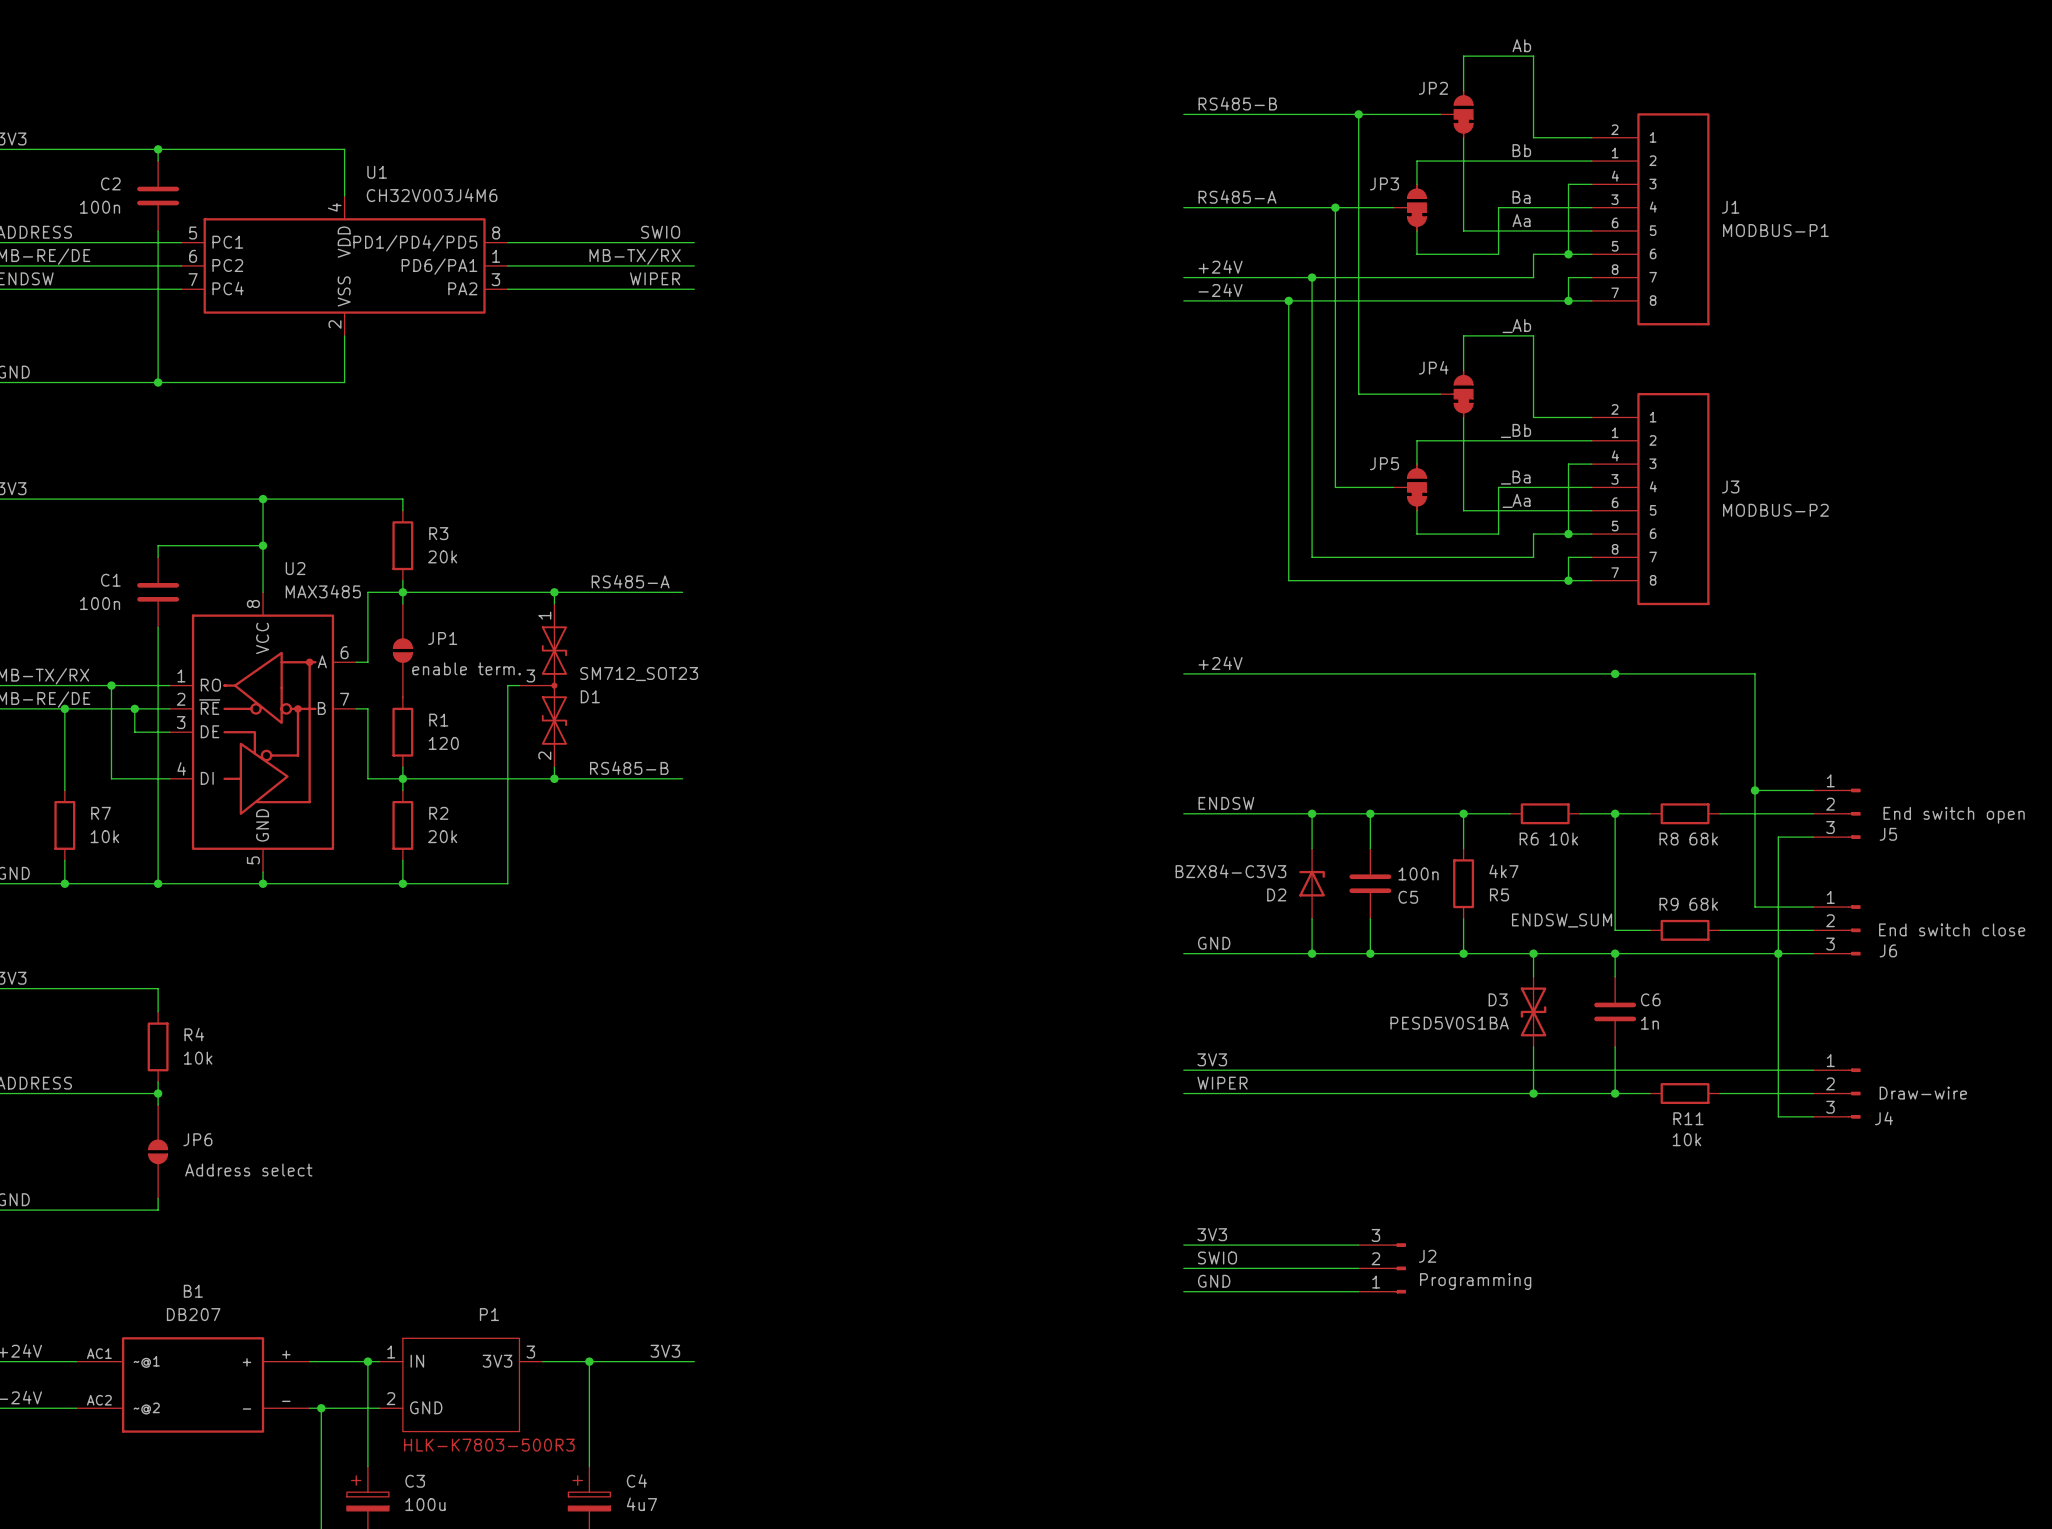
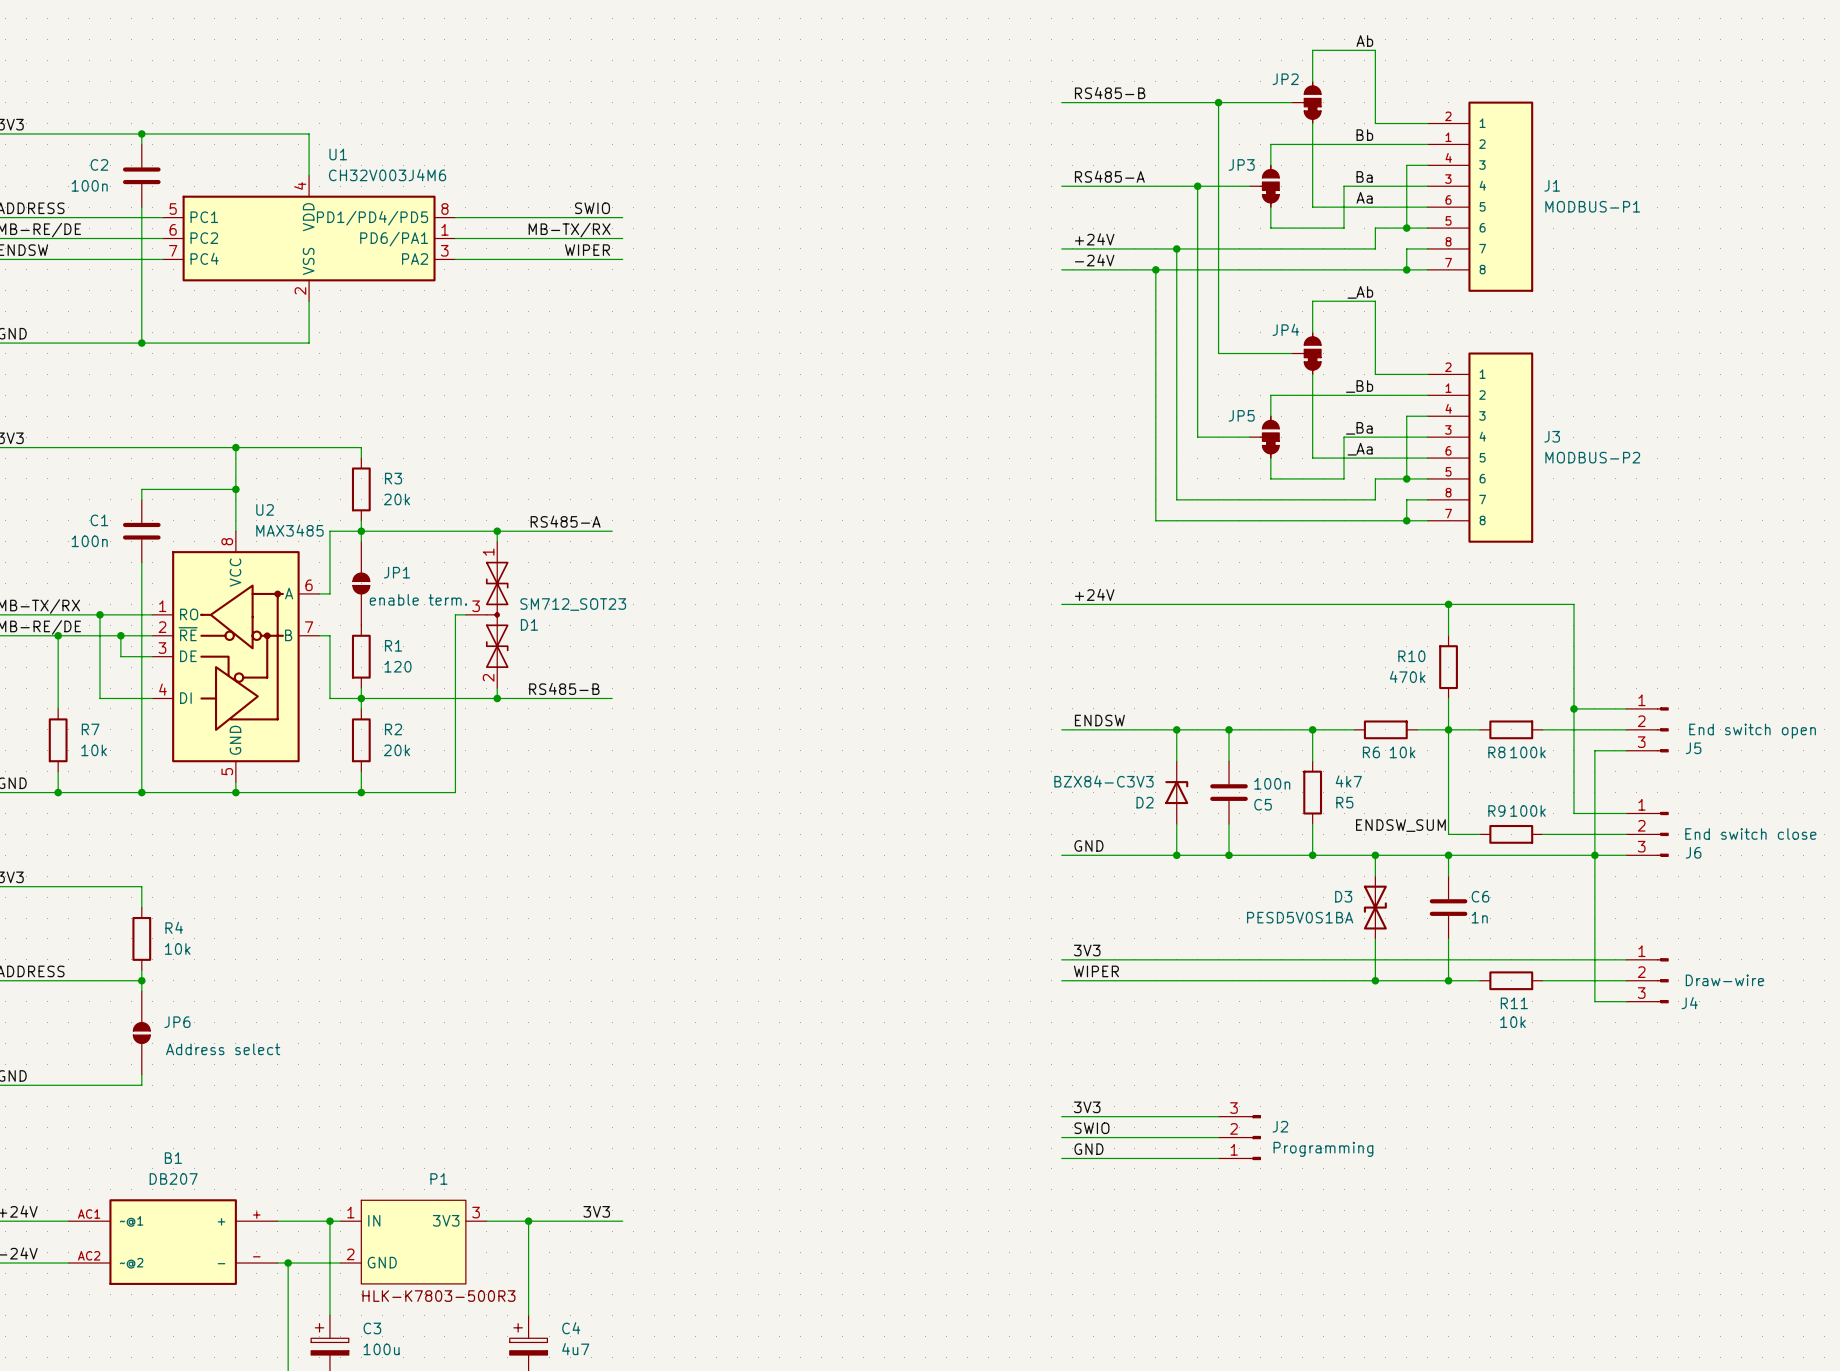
wire: none -> (1448, 604) (1448, 635)
R10: none -> 470k (1448, 667)
wire: none -> (1448, 698) (1448, 729)
R8 value: 68k (1703, 839) -> 100k (1528, 752)
R9 value: 68k (1703, 904) -> 100k (1528, 811)

